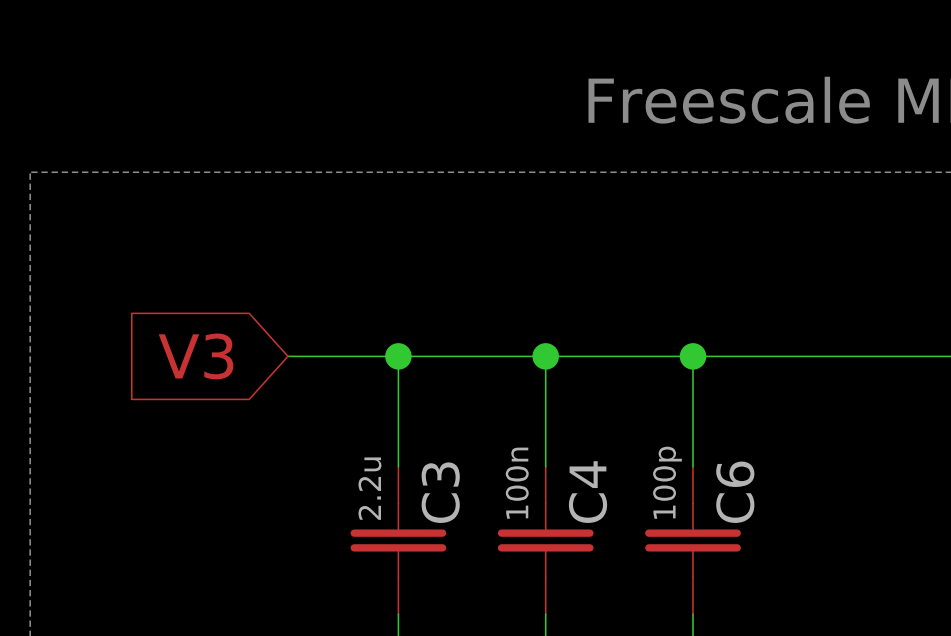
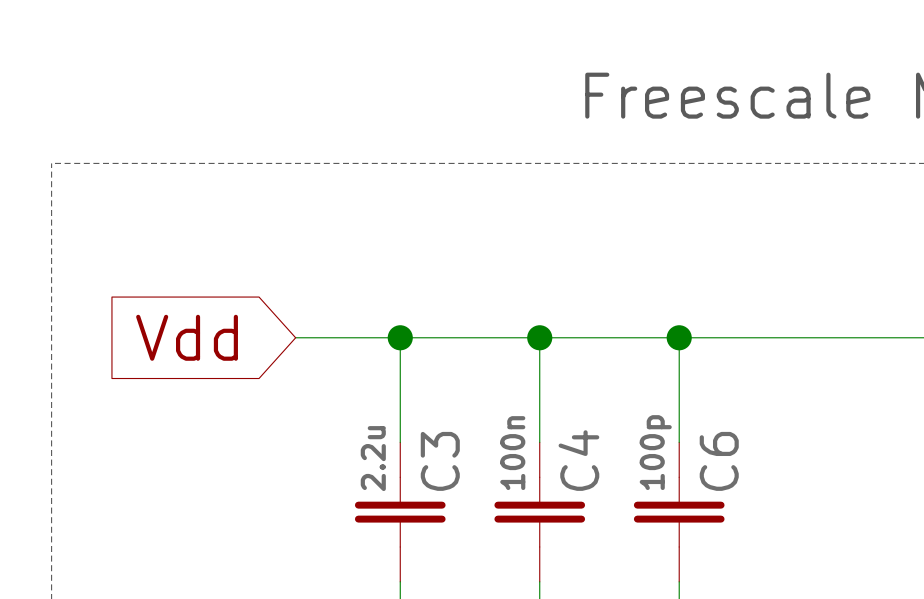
global label: V3 (196, 356) -> Vdd (187, 337)

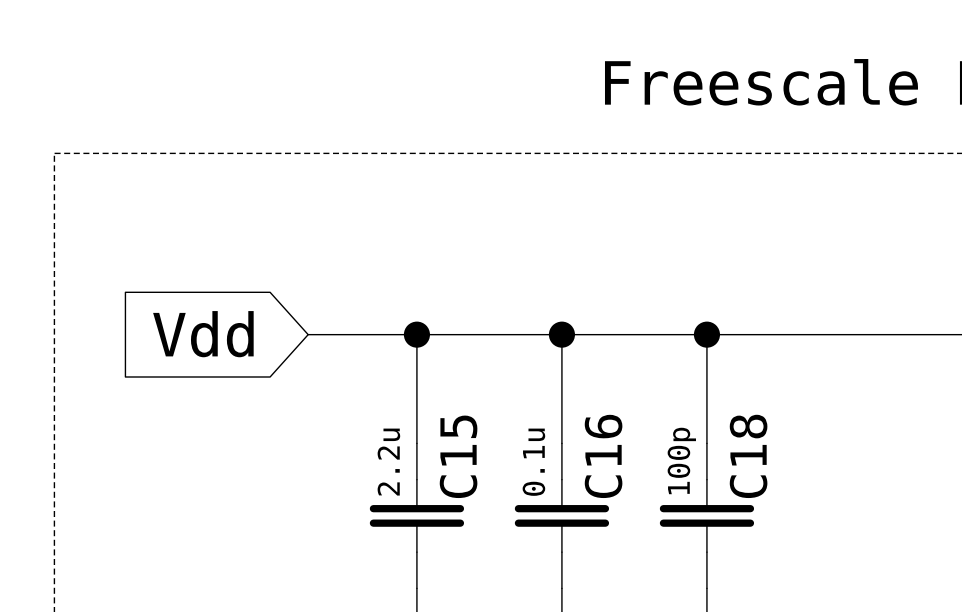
C4 value: 100n (512, 453) -> 0.1u (533, 462)
C4 name: C4 (578, 460) -> C16 (603, 456)
C3 name: C3 (440, 461) -> C15 (458, 456)
C6 name: C6 (719, 461) -> C18 (748, 456)

